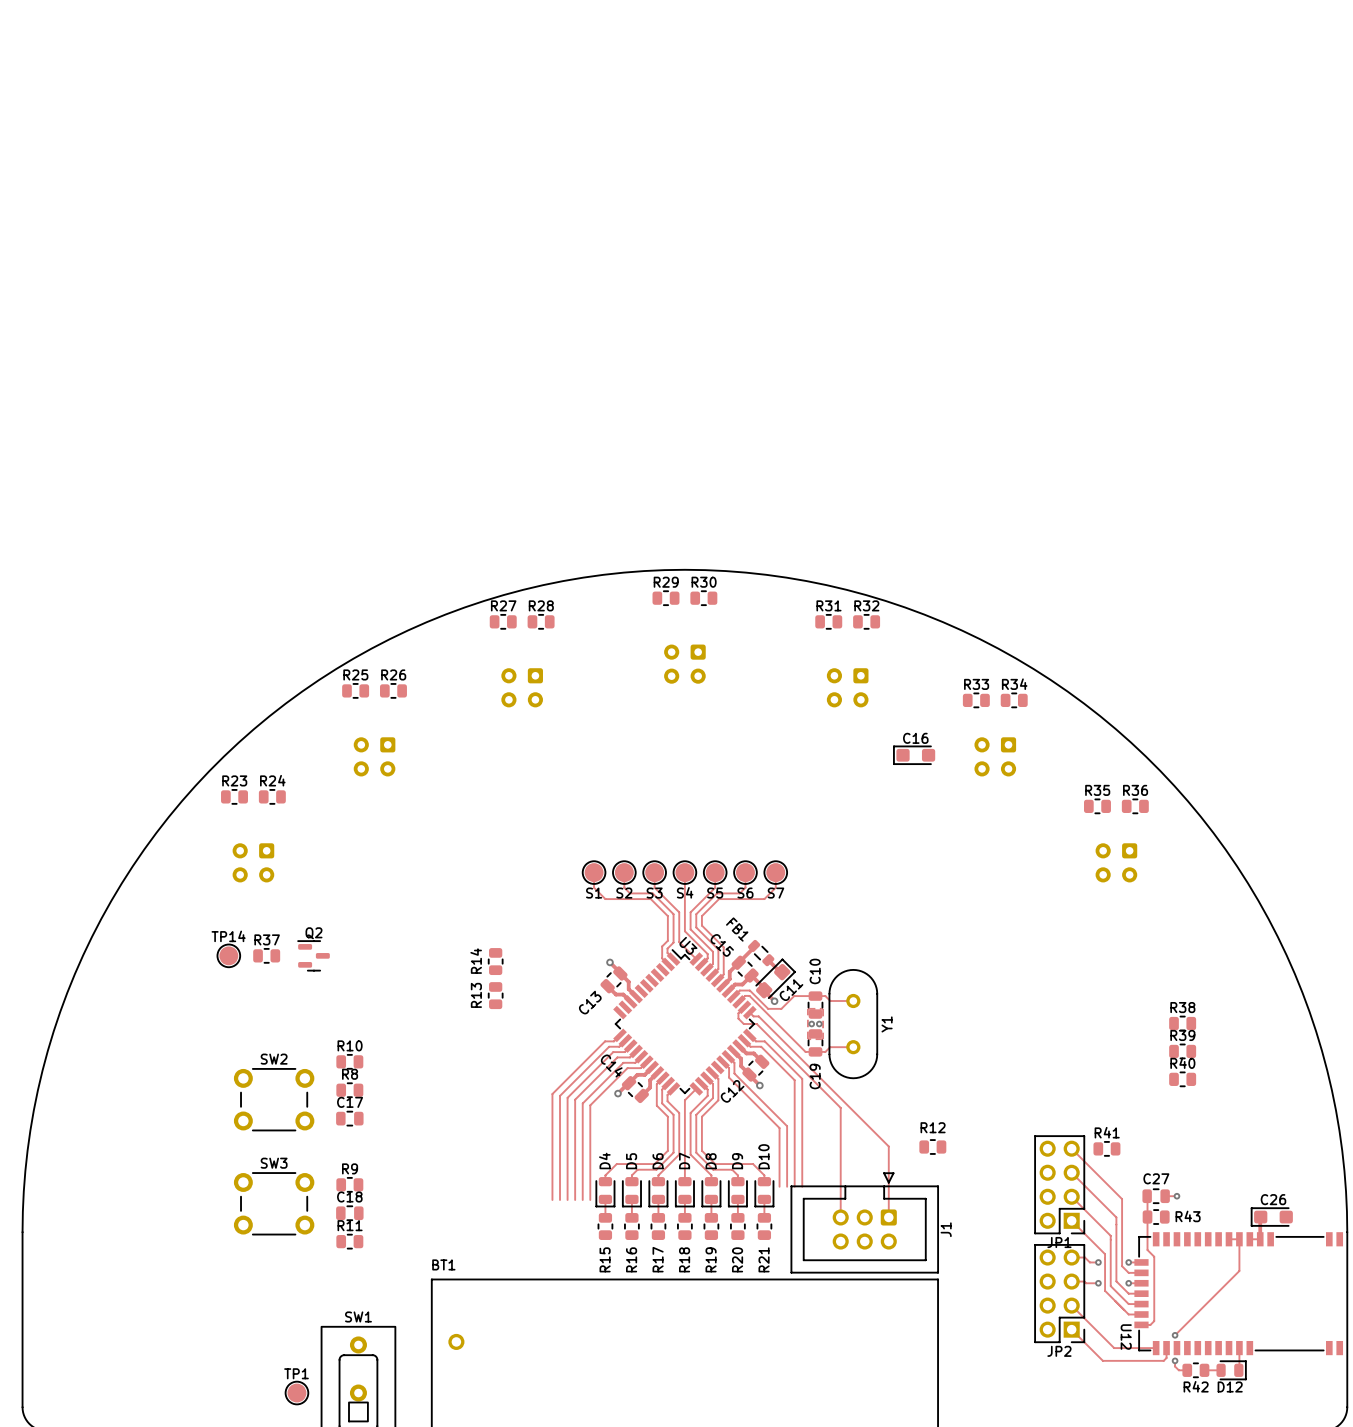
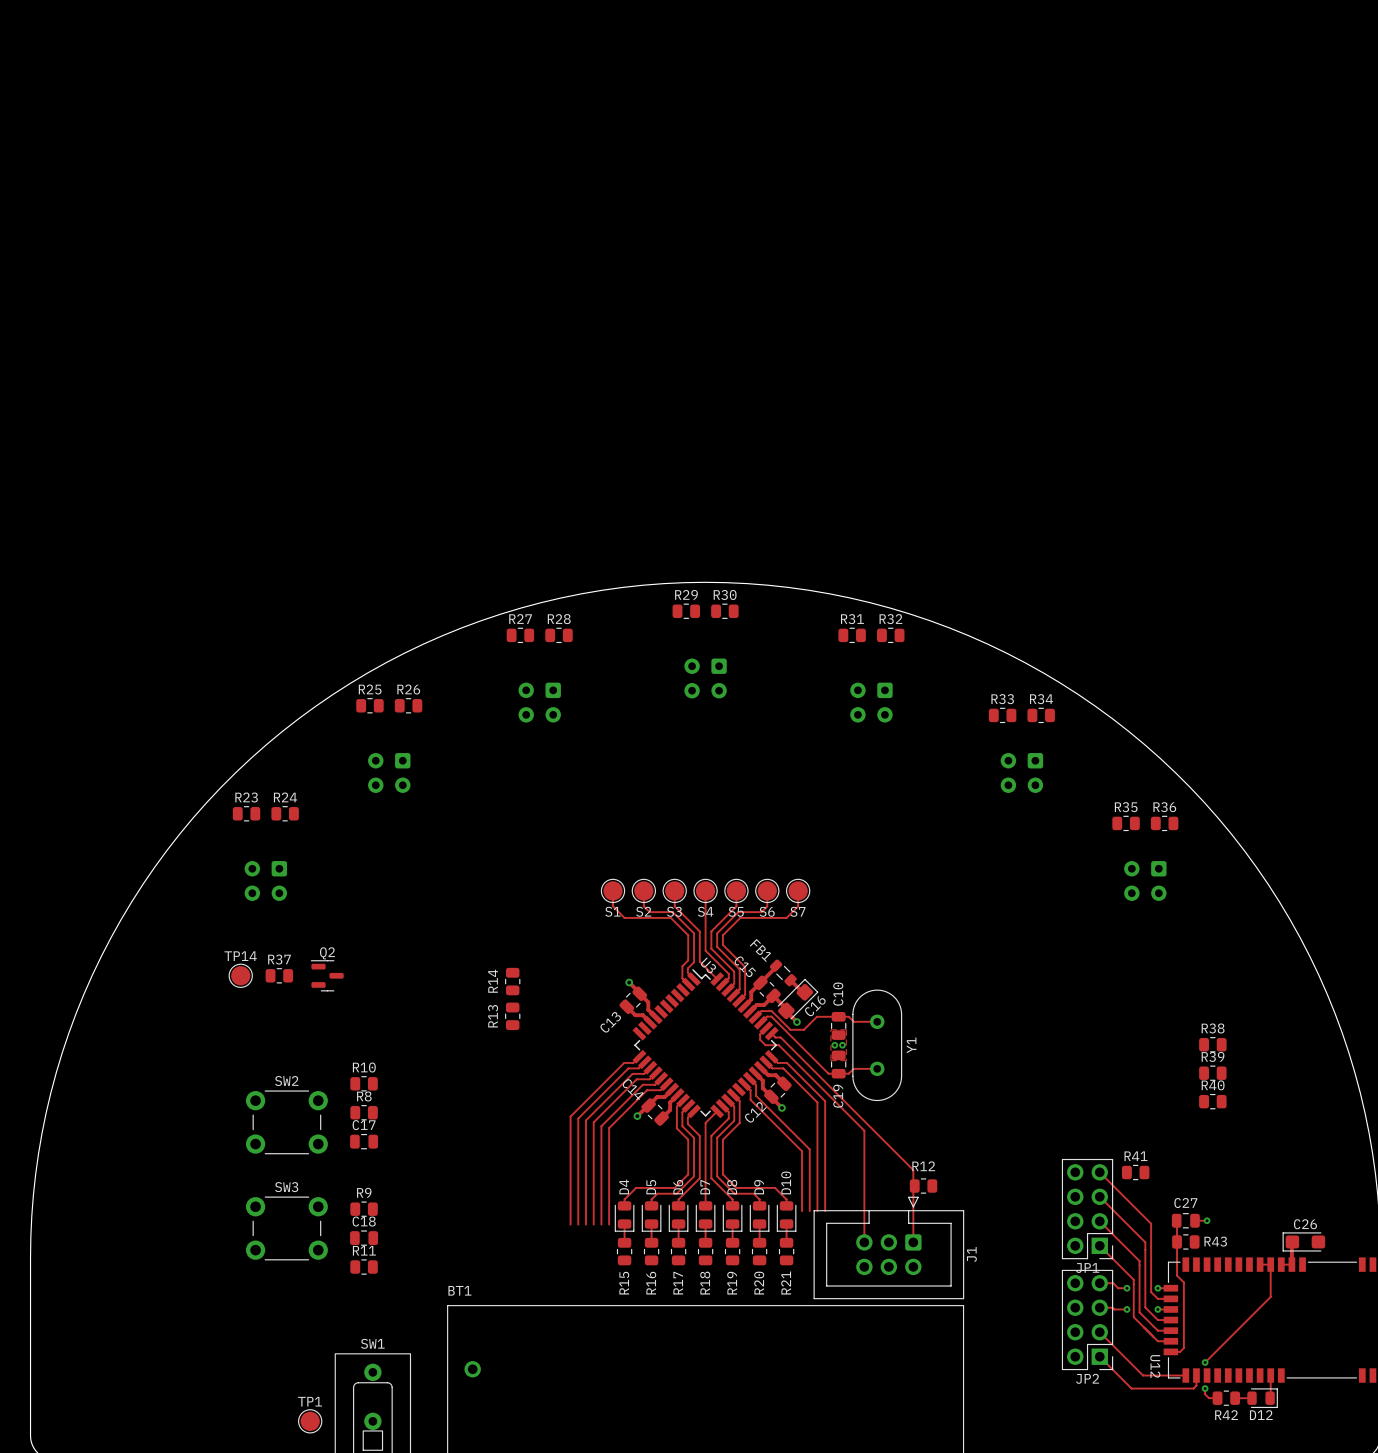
C16: (914, 755) -> none
C11 name: C11 (791, 990) -> C16 (815, 1005)
R12 position: (932, 1147) -> (923, 1186)

